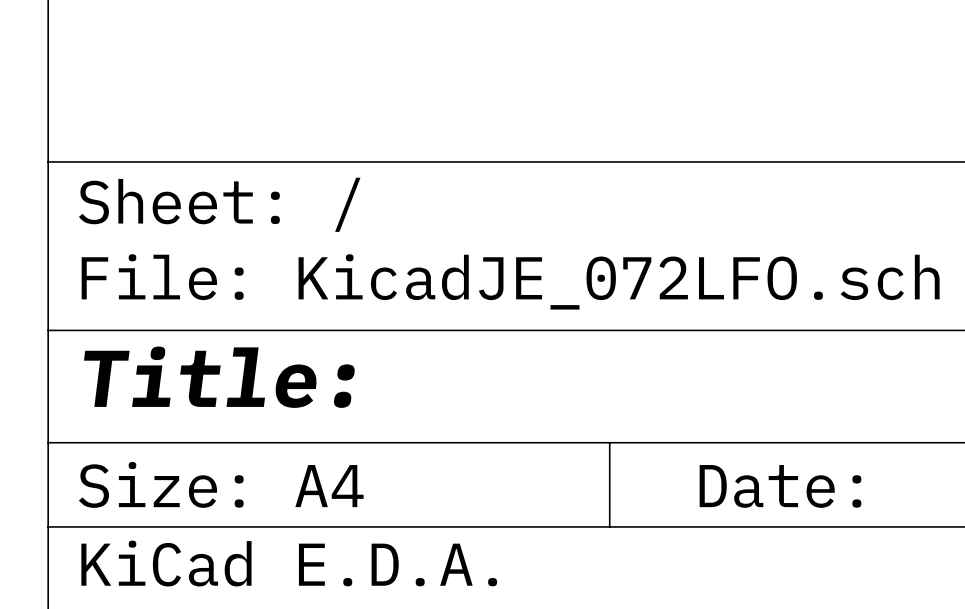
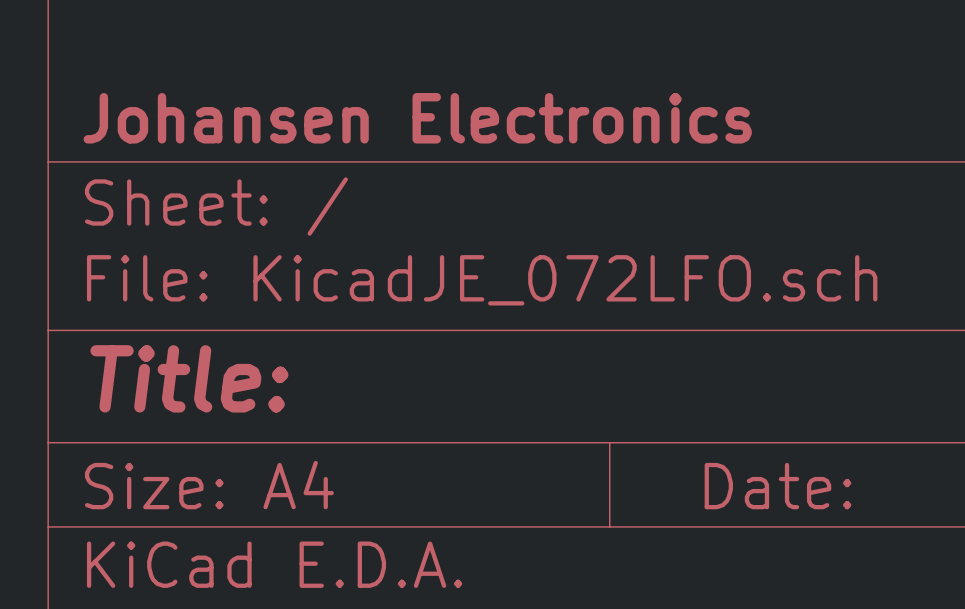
title block: none -> Johansen Electronics (417, 118)

